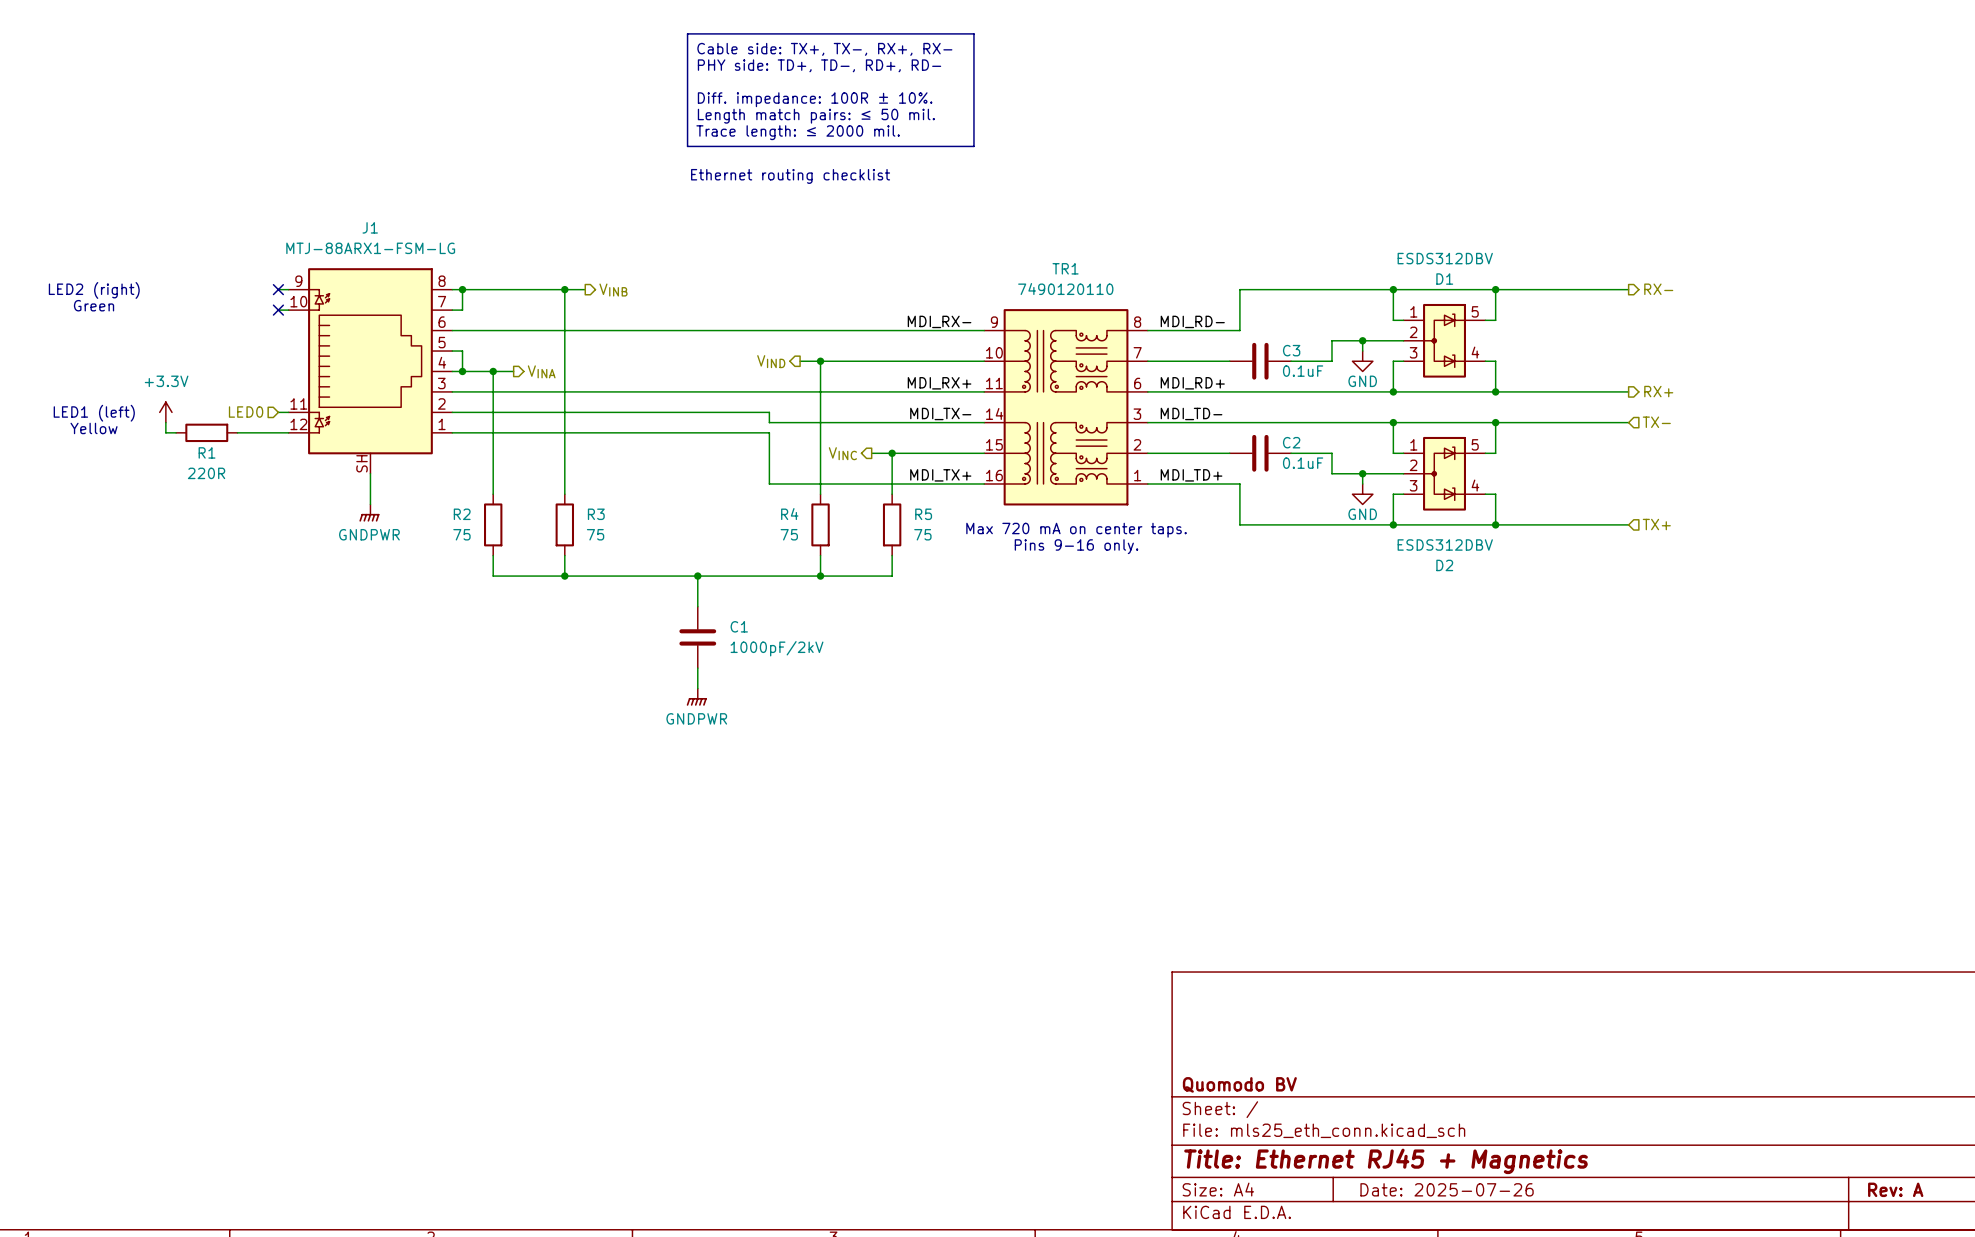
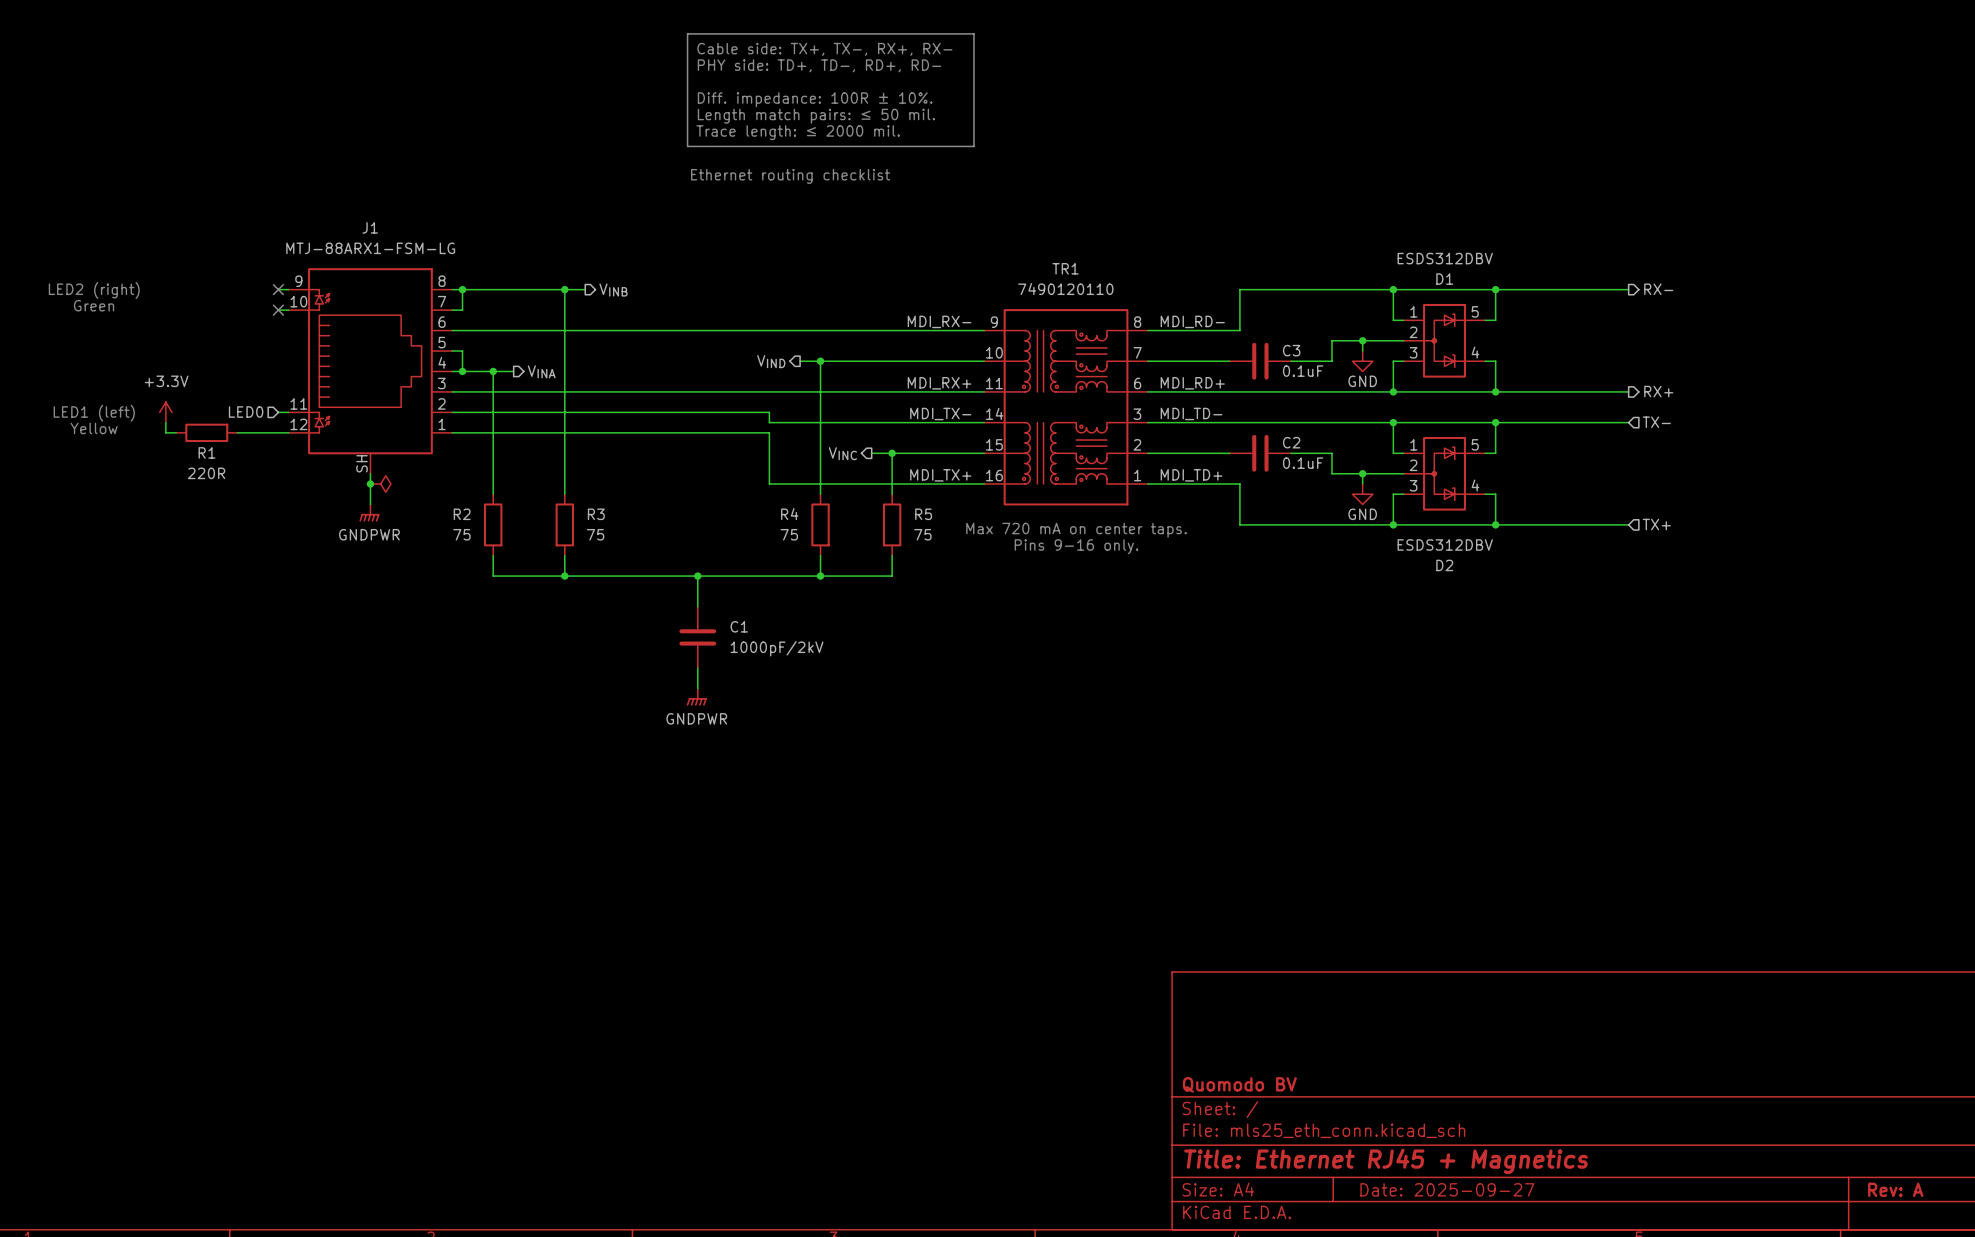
junction: none -> (370, 483)
power symbol: none -> (380, 483)
title block: Date: 2025-07-26 (1447, 1189) -> Date: 2025-09-27 (1447, 1189)

